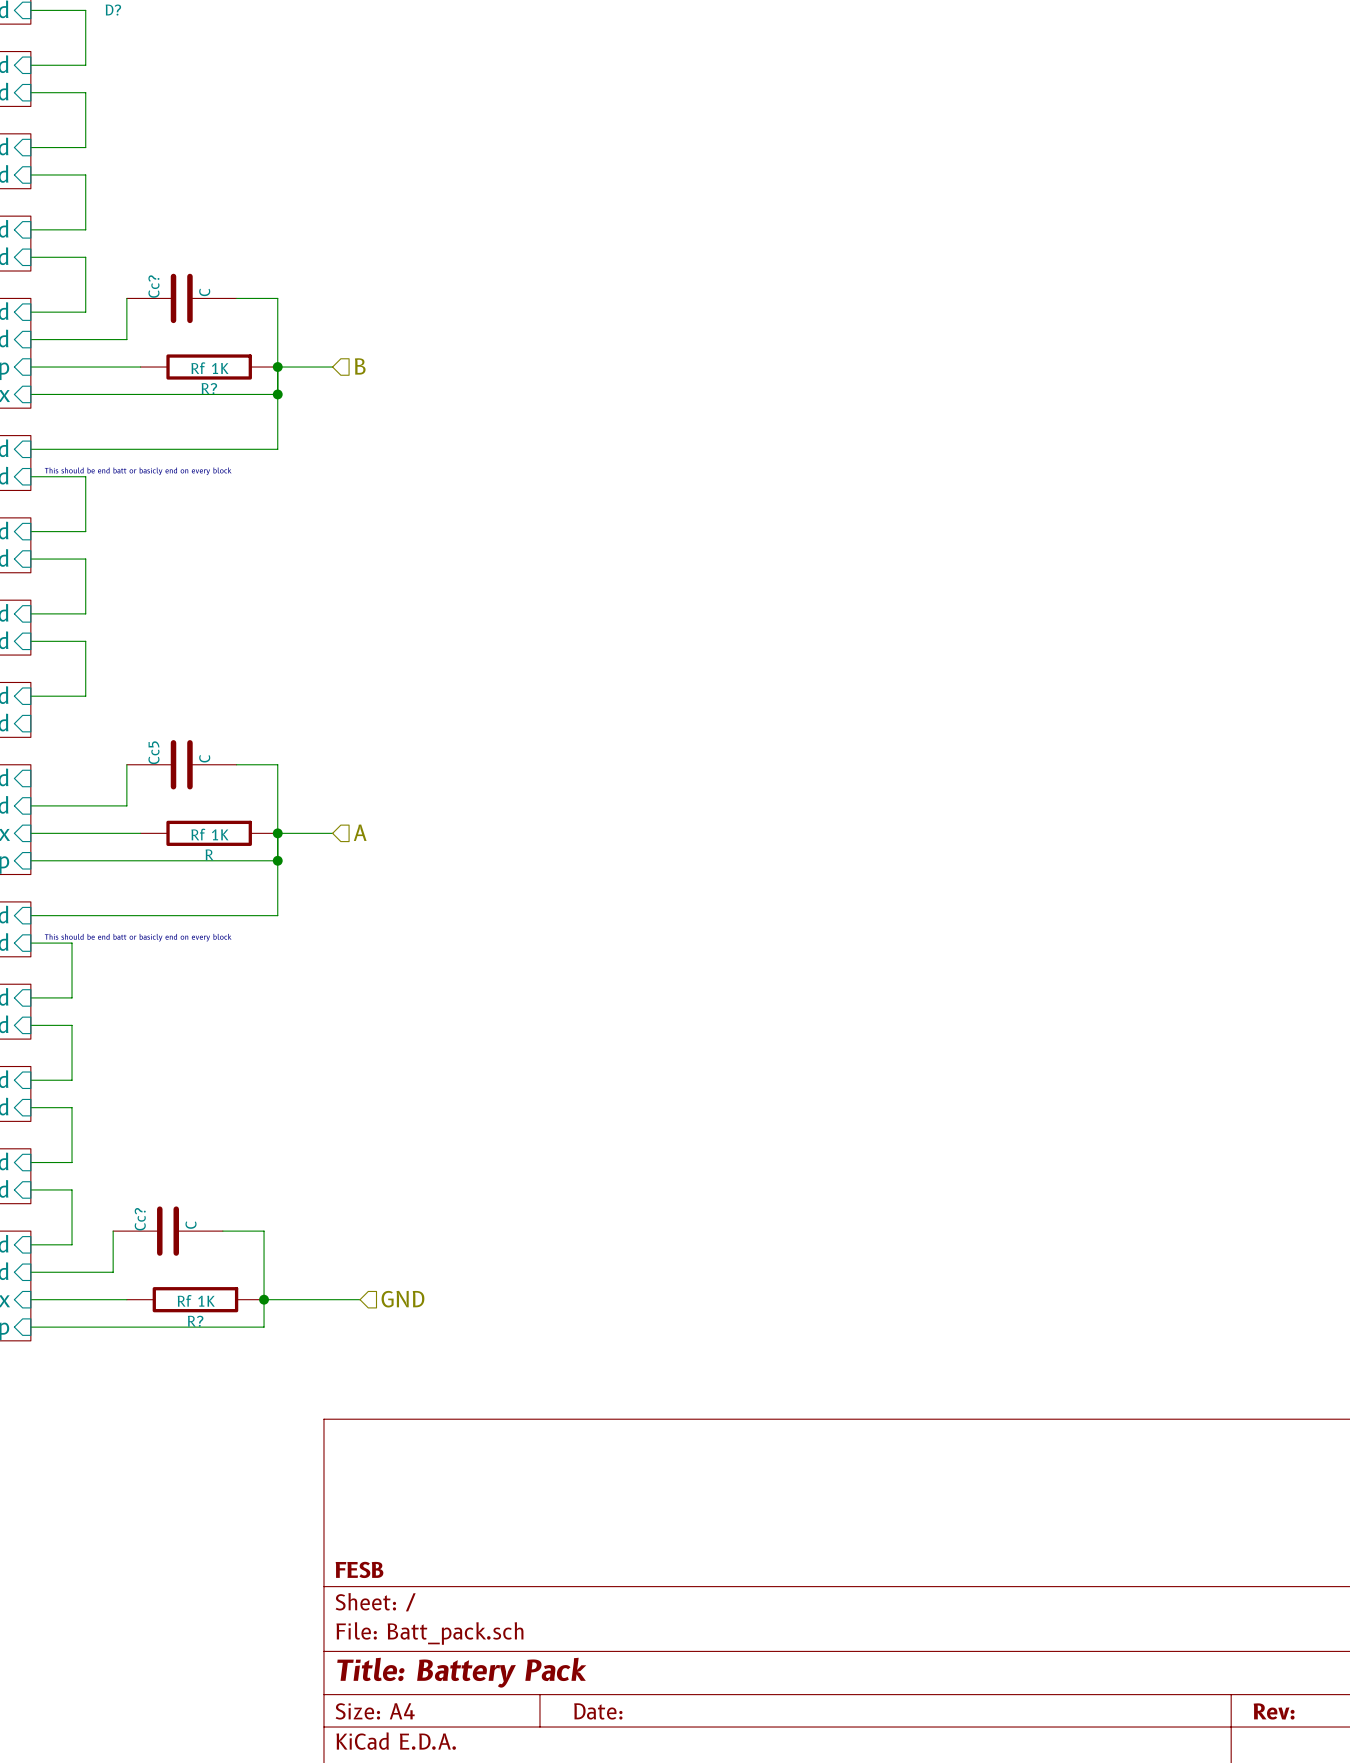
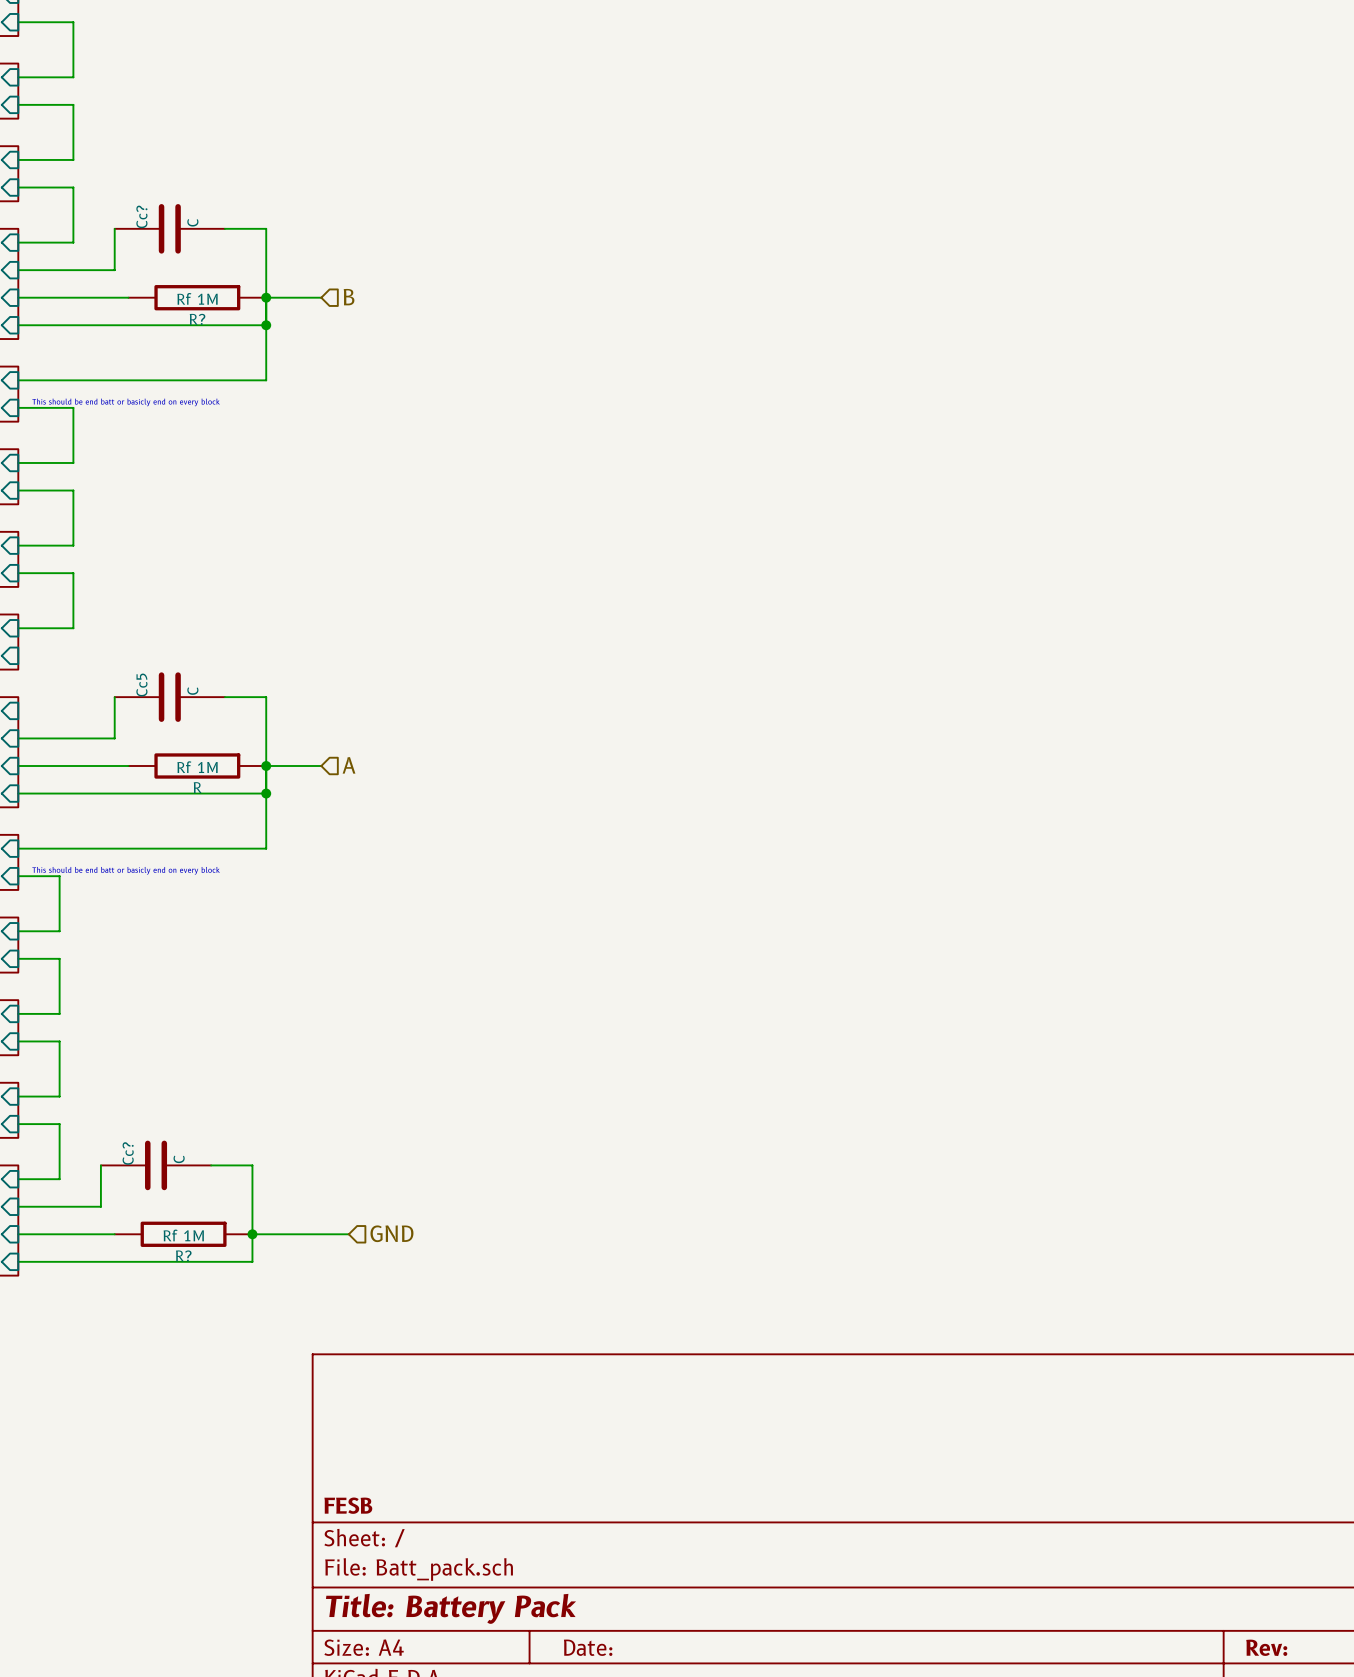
R? value: Rf 1K (209, 368) -> Rf 1M (197, 298)
R value: Rf 1K (209, 834) -> Rf 1M (197, 767)
R? value: Rf 1K (196, 1300) -> Rf 1M (183, 1235)

